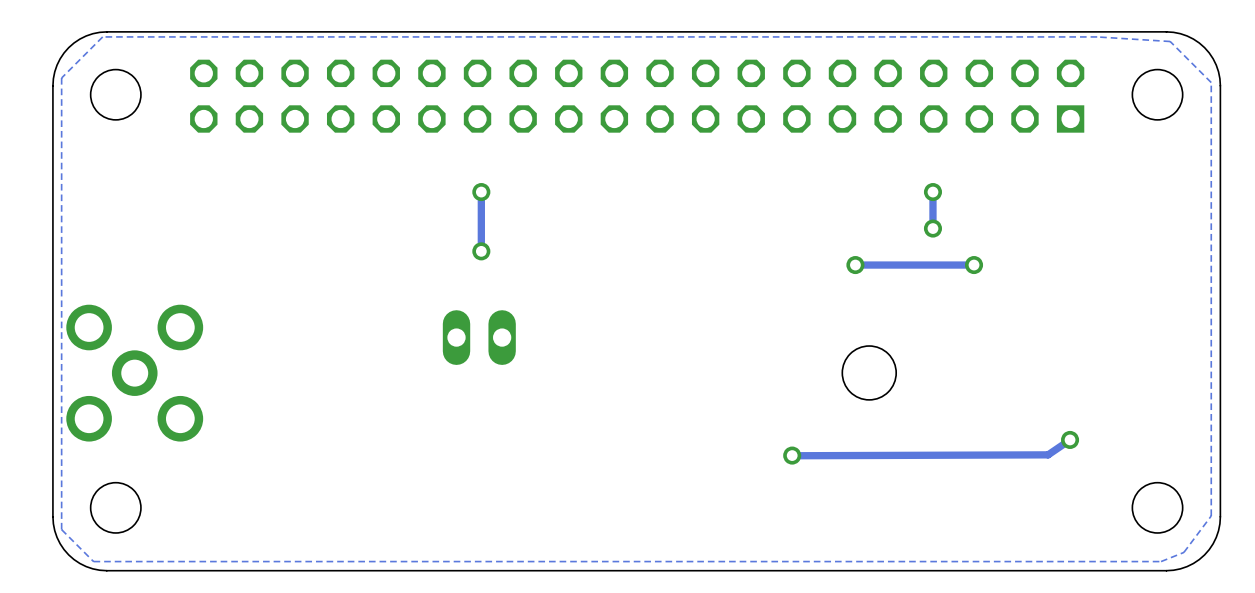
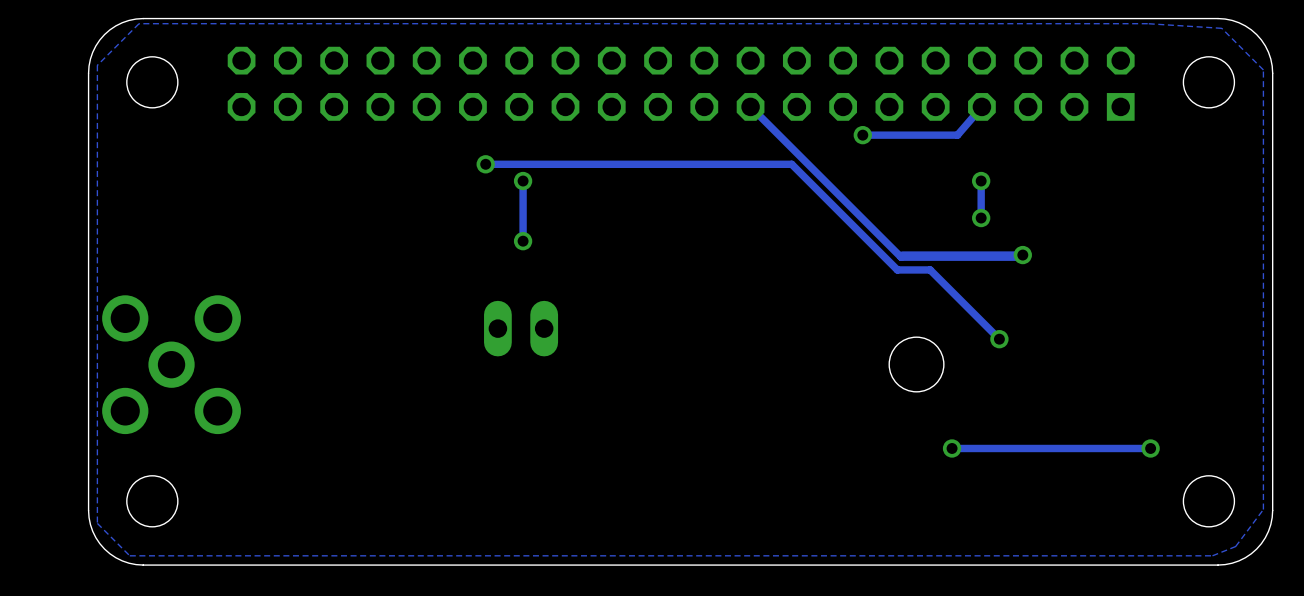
track: none -> (750, 106) (901, 257) (1019, 257)
track: none -> (981, 106) (957, 135) (862, 135)
via: none -> (862, 135)
track: none -> (485, 164) (791, 164) (897, 269) (930, 269) (999, 339)
via: none -> (485, 164)
via: (855, 265) -> none
via: none -> (999, 339)
track: (1070, 439) (1048, 454) (792, 455) -> none
via position: (1070, 439) -> (1150, 448)
via: (792, 455) -> none
via: none -> (952, 448)
track: none -> (1150, 448) (952, 448)

